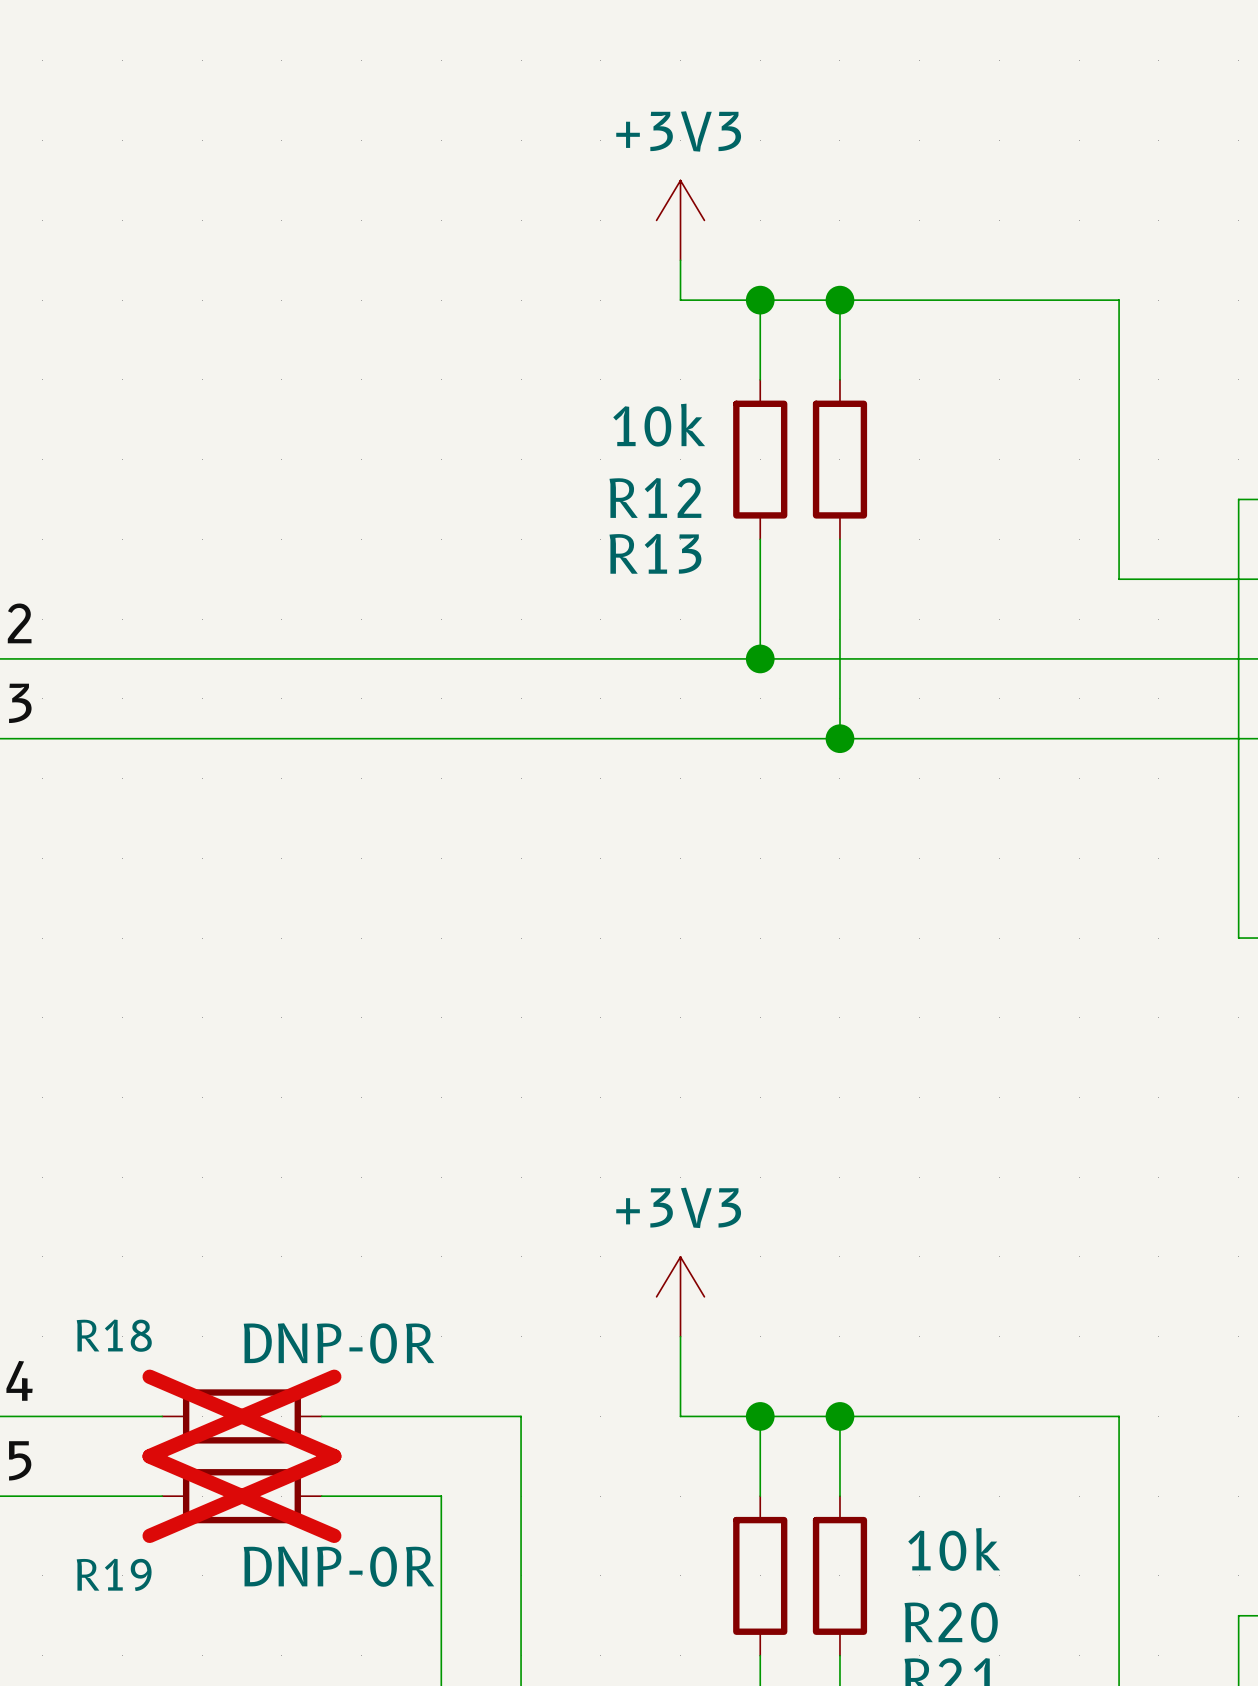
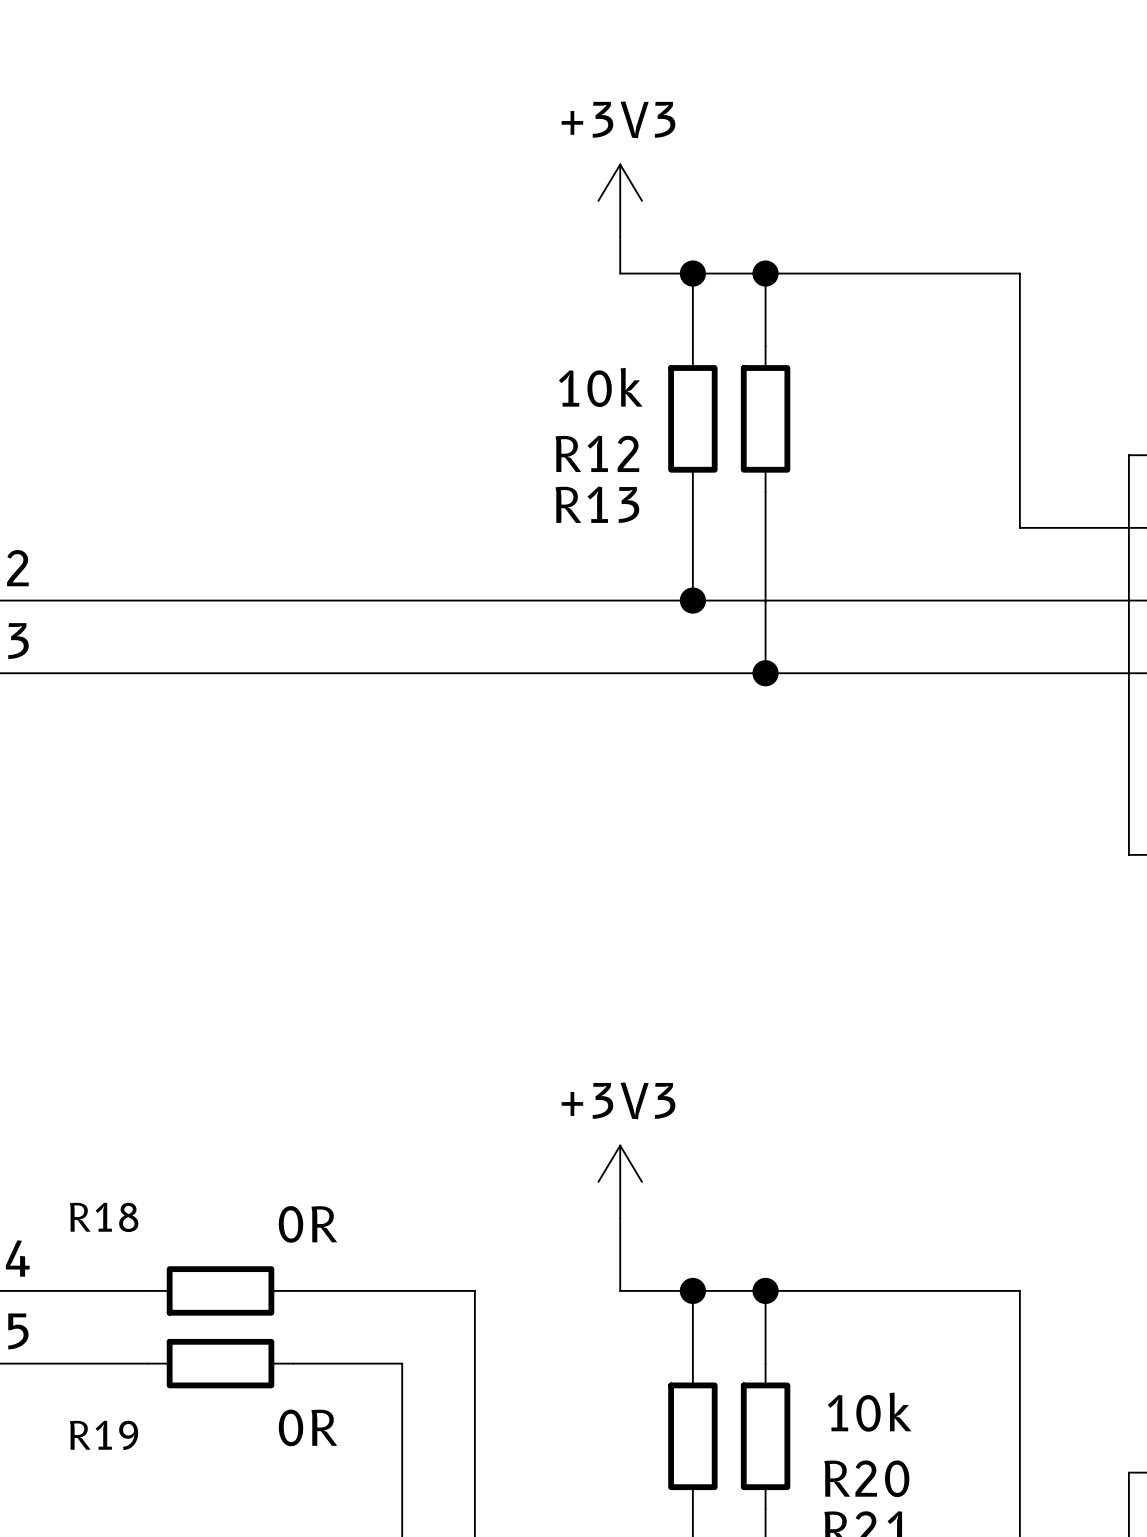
R18 value: DNP-0R (339, 1343) -> 0R (308, 1224)
R18 do-not-place cross: (241, 1416) -> none
R19 do-not-place cross: (241, 1496) -> none
R19 value: DNP-0R (339, 1566) -> 0R (308, 1427)

